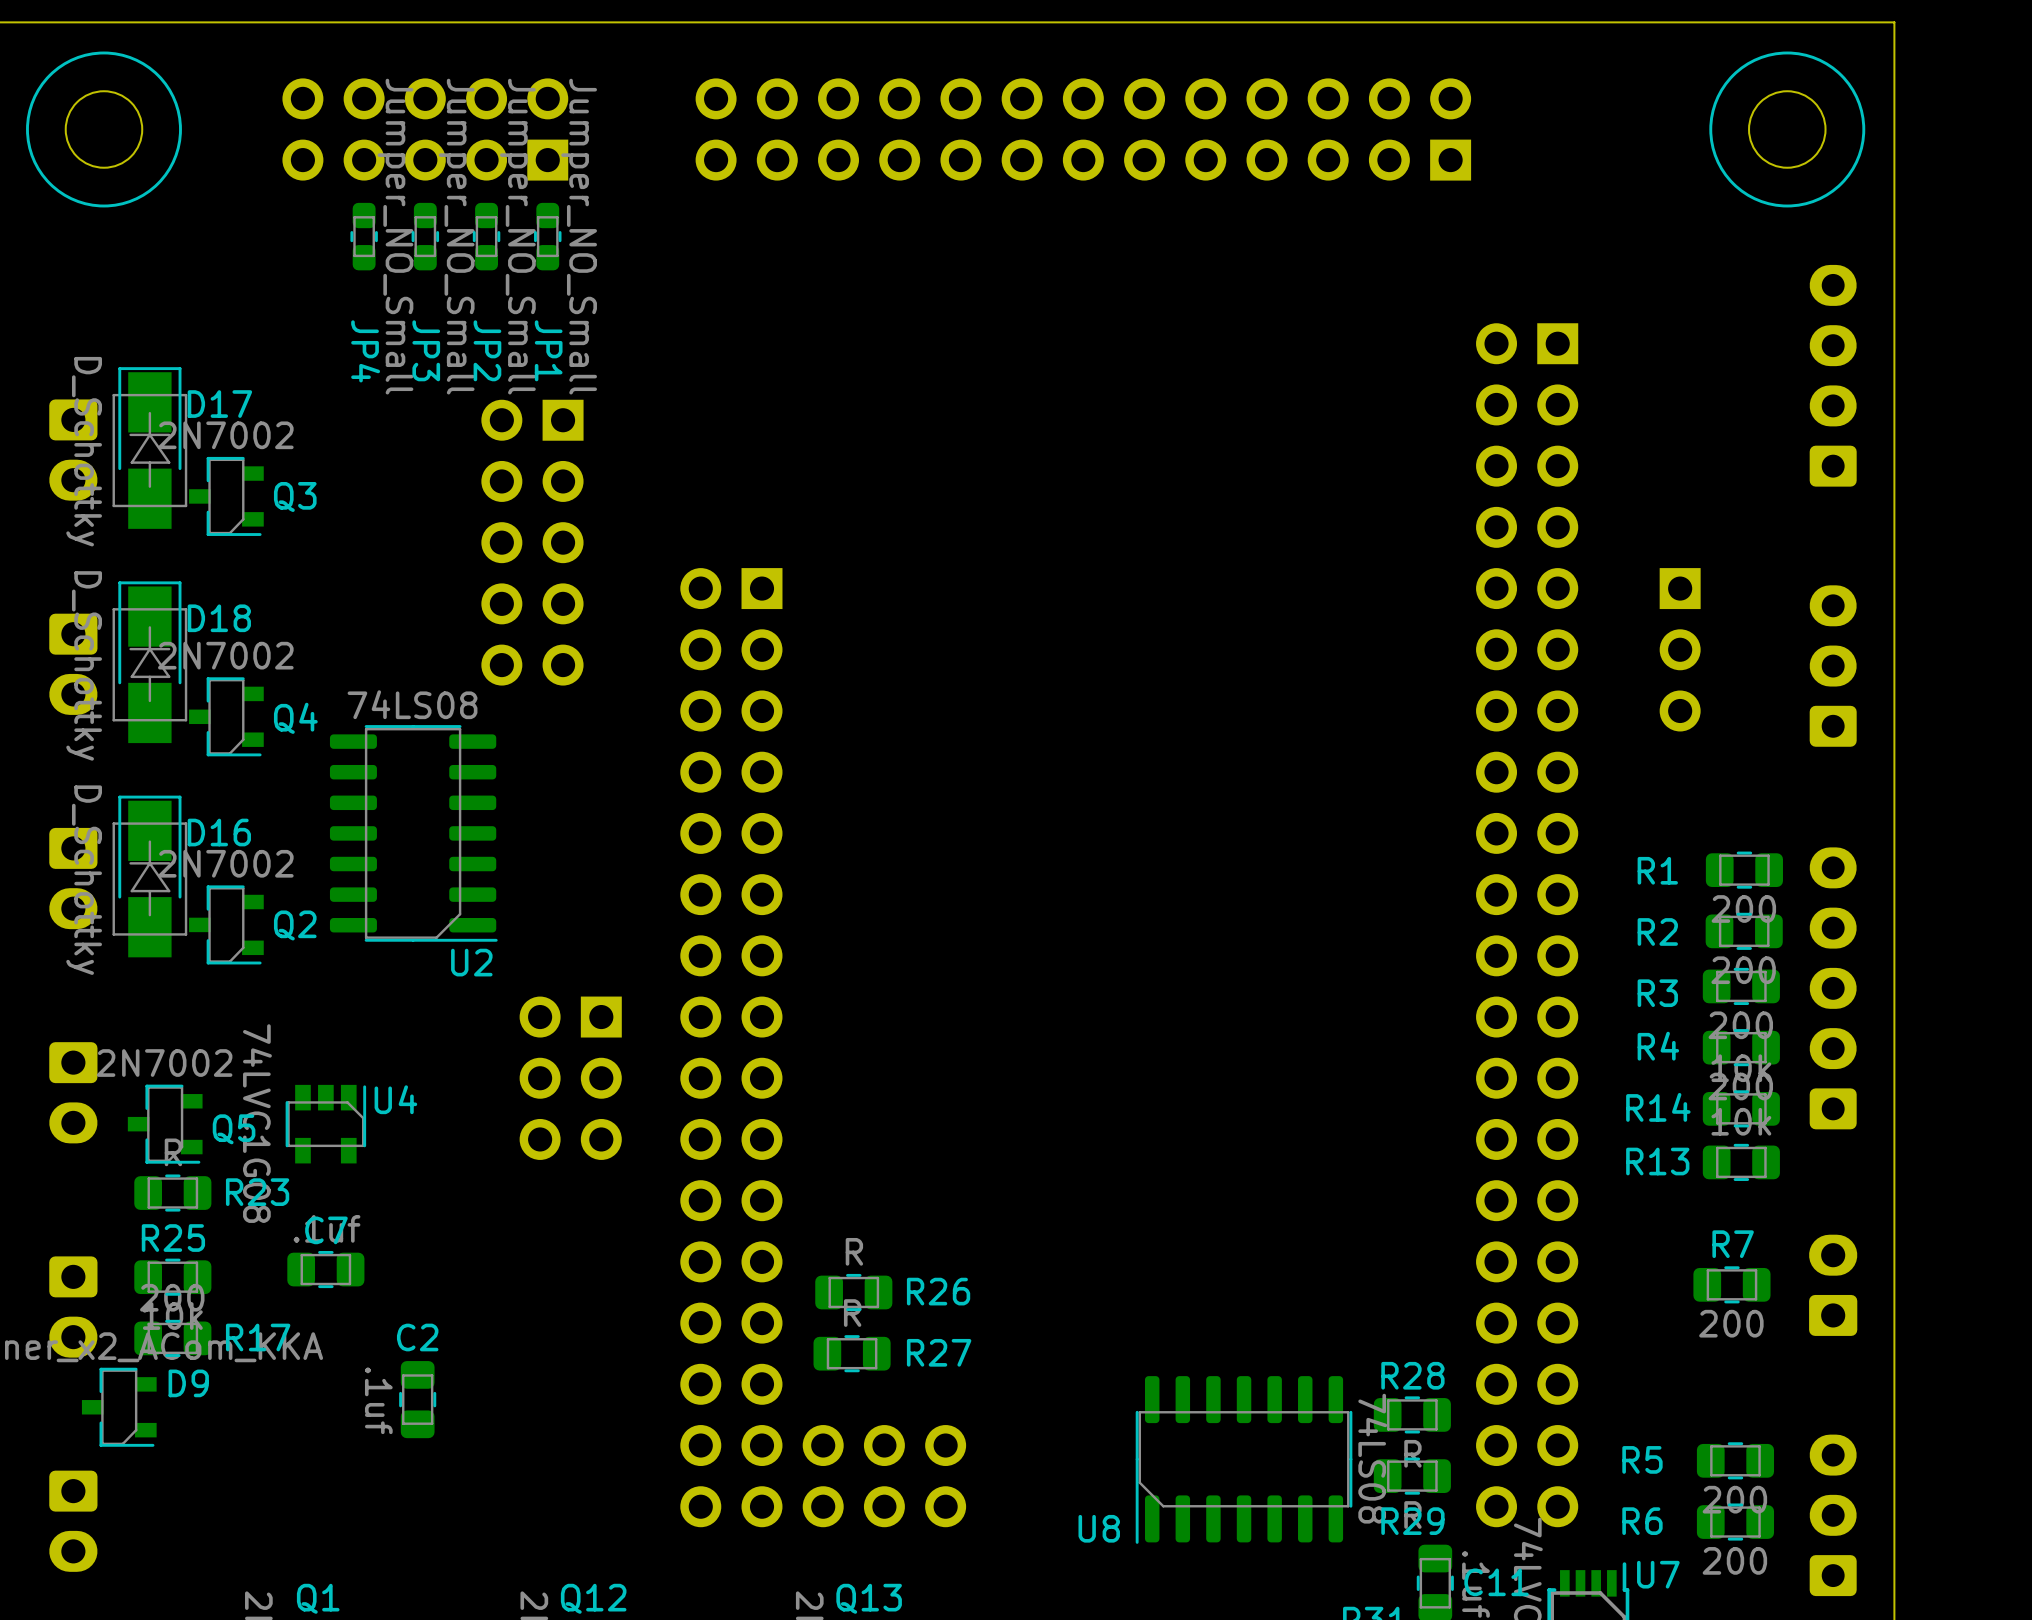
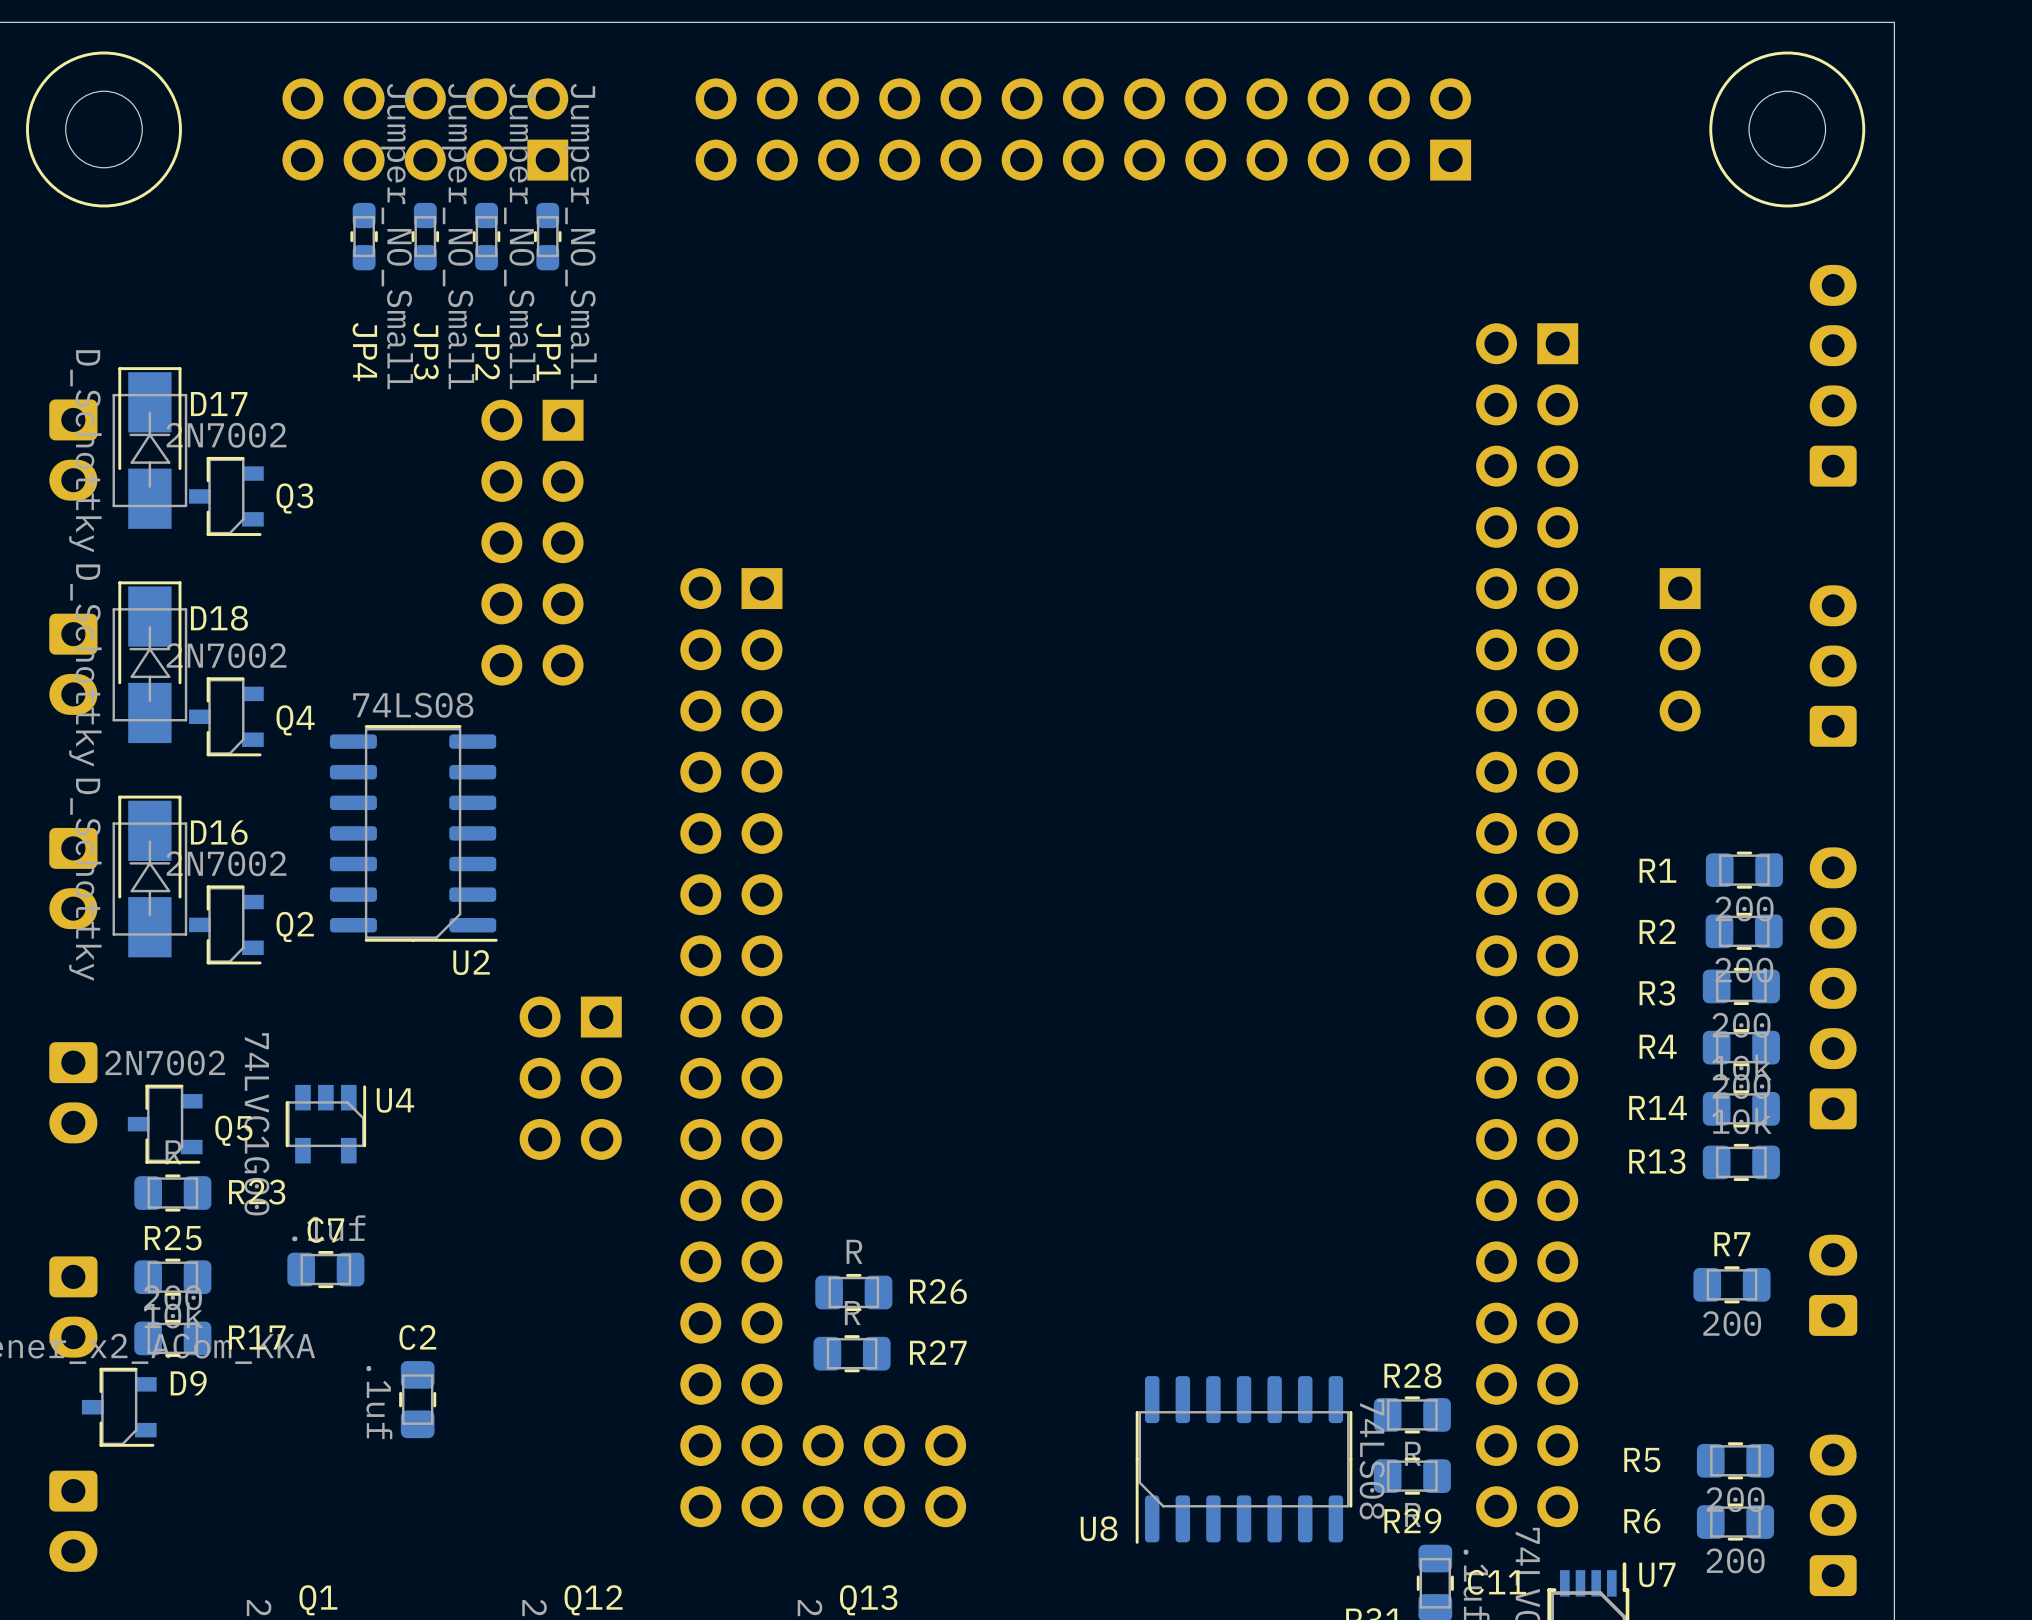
U4 value: 74LVC1G08 (257, 1123) -> 74LVC1G00 (256, 1124)

